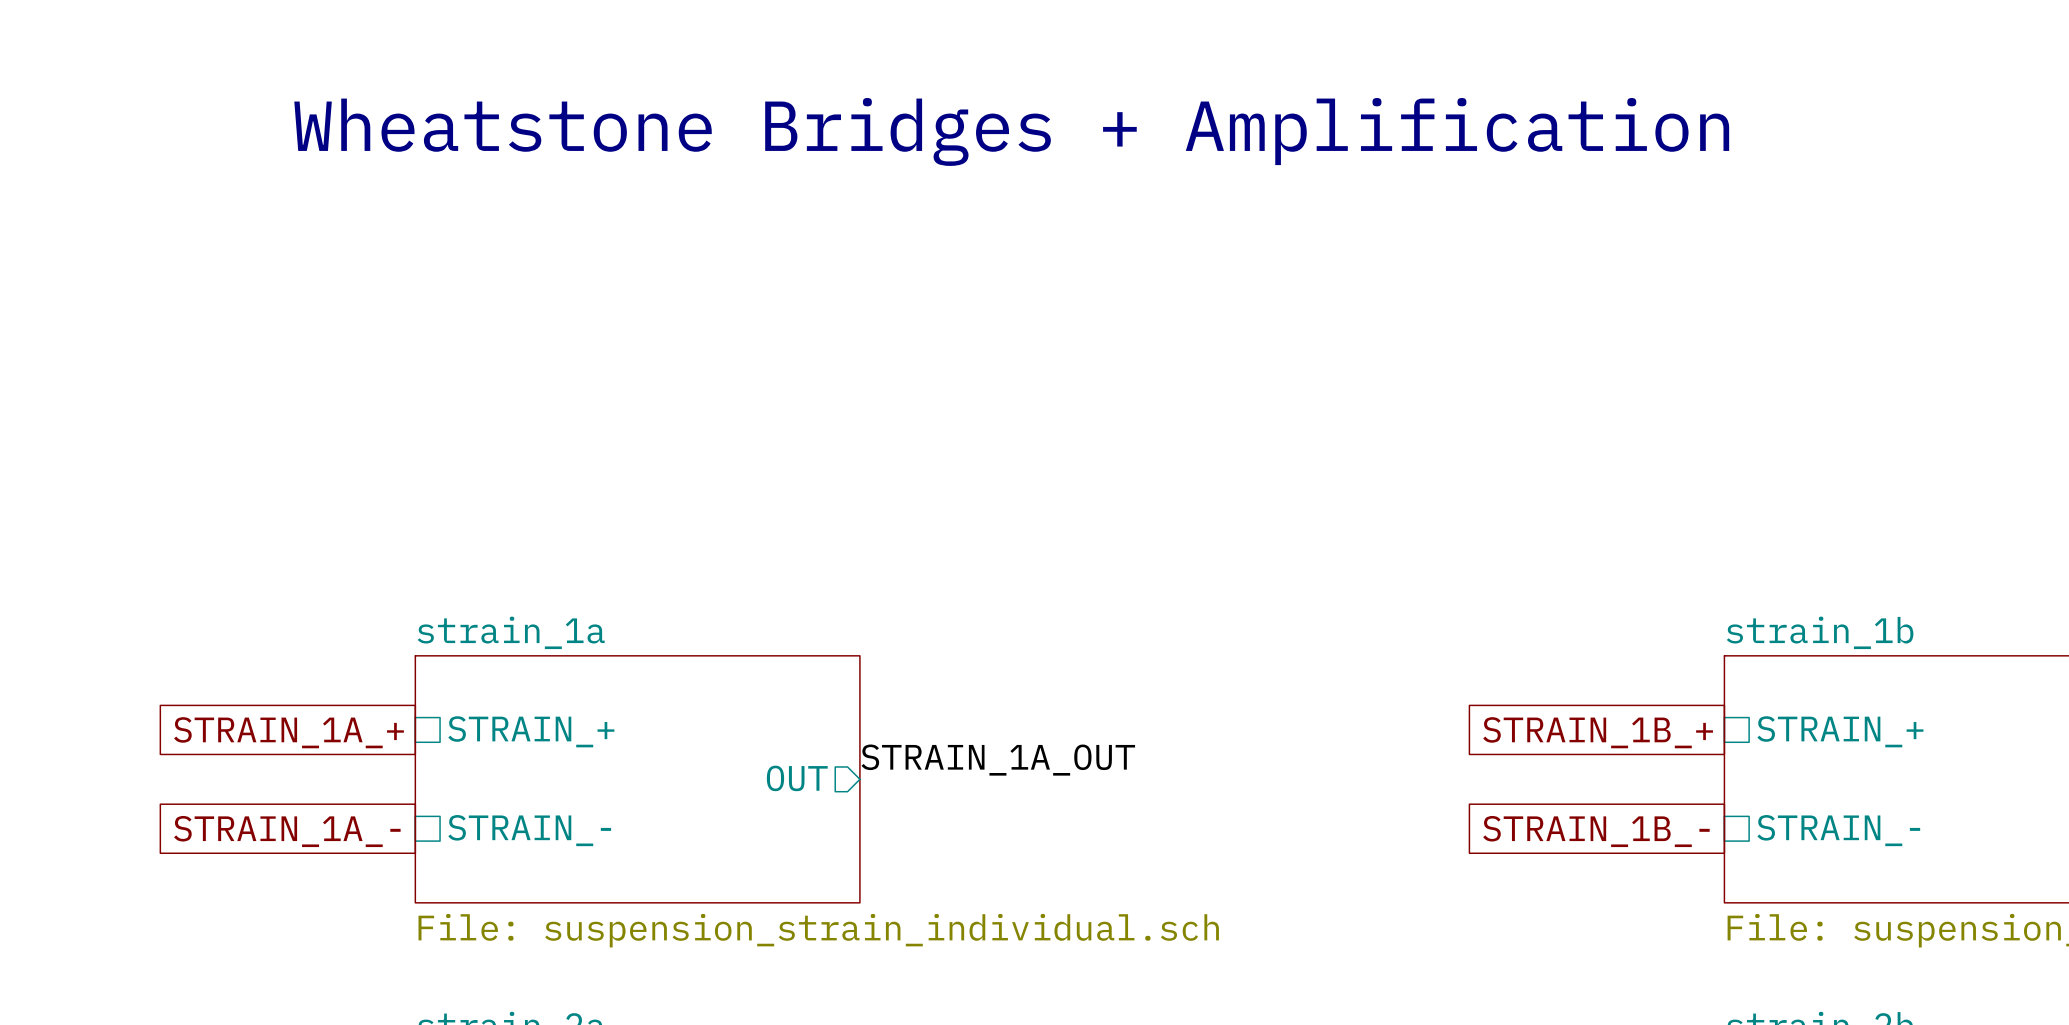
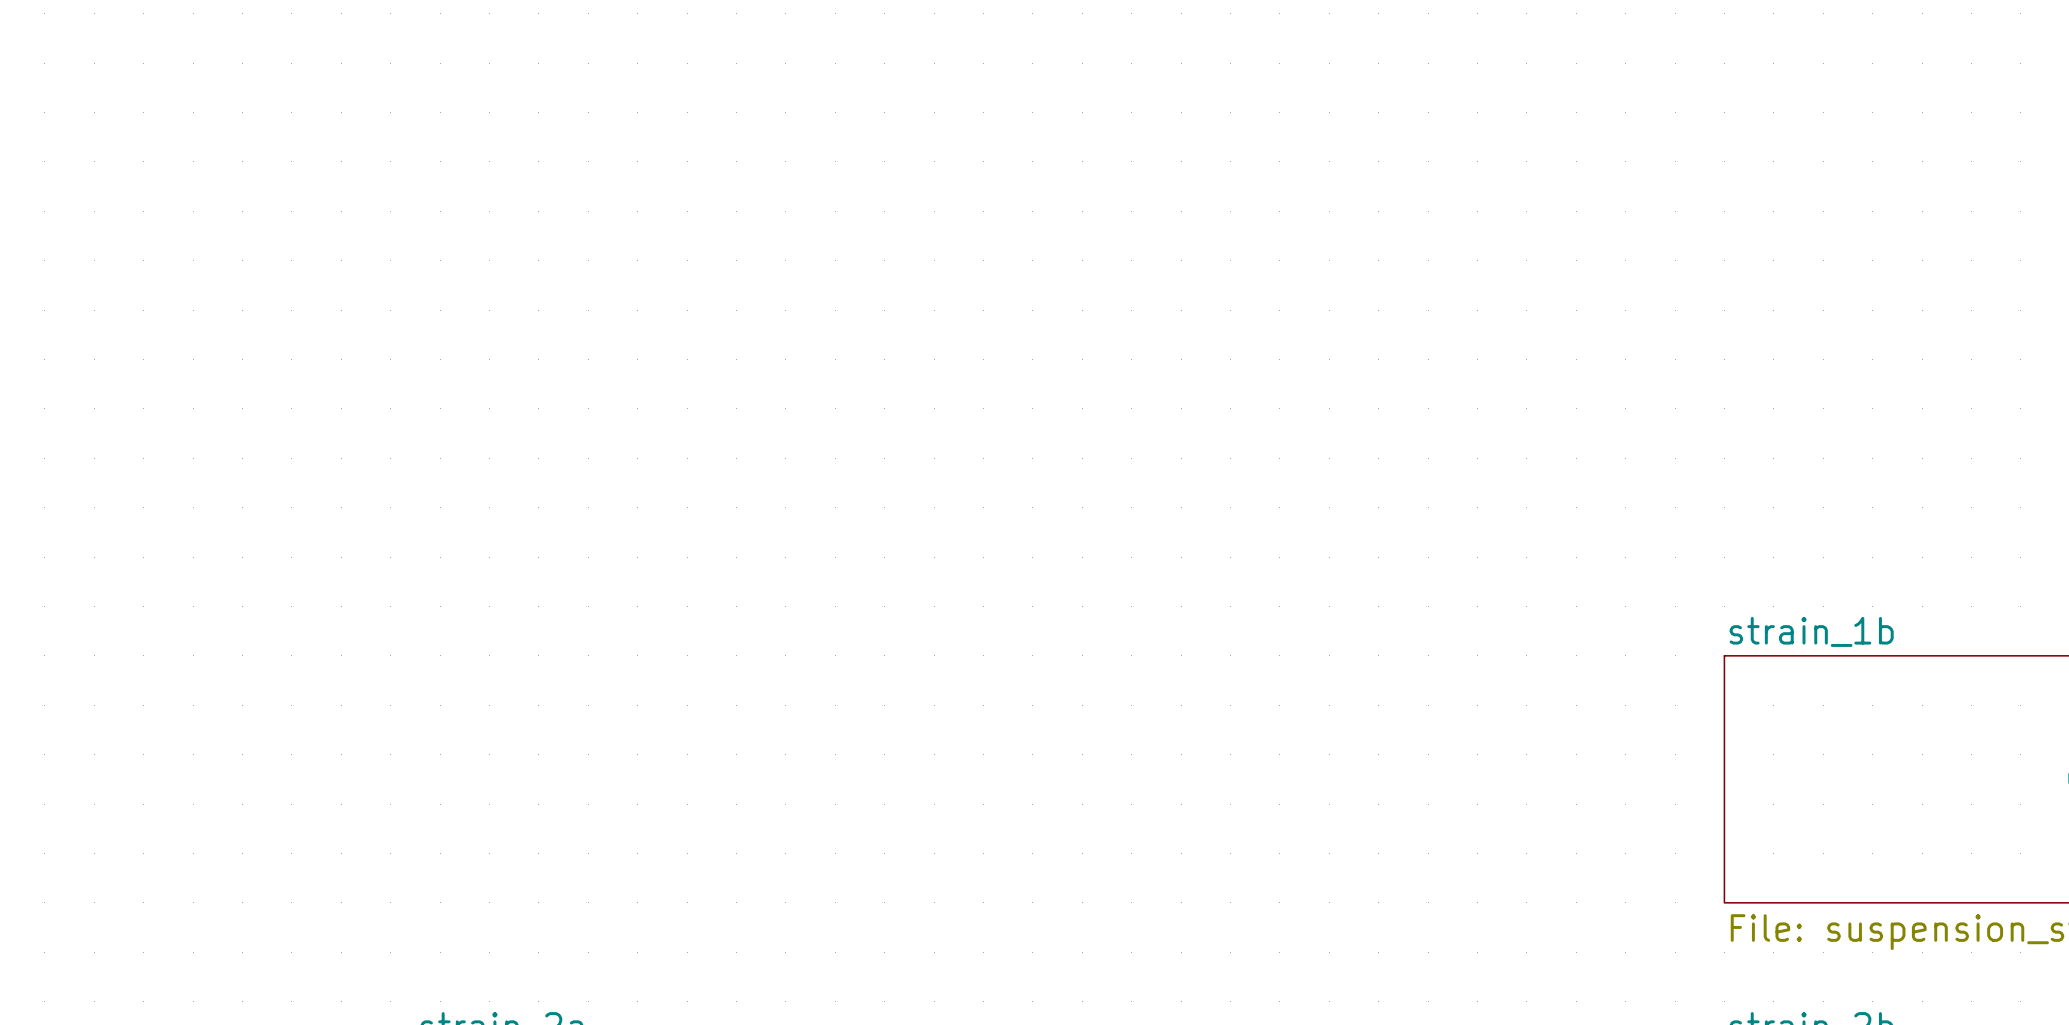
text: Wheatstone Bridges + Amplification (1011, 131) -> none
sheet pin: STRAIN_+ (531, 731) -> none
sheet pin: STRAIN_+ (1840, 731) -> none
global label: STRAIN_1A_+ (288, 732) -> none
global label: STRAIN_1B_+ (1598, 732) -> none
label: STRAIN_1A_OUT (998, 760) -> none
sheet pin: OUT (797, 778) -> none
sheet strain_1a: File: suspension_strain_individual.sch (637, 779) -> none
sheet pin: STRAIN_- (529, 830) -> none
sheet pin: STRAIN_- (1838, 830) -> none
global label: STRAIN_1A_- (287, 831) -> none
global label: STRAIN_1B_- (1596, 831) -> none

